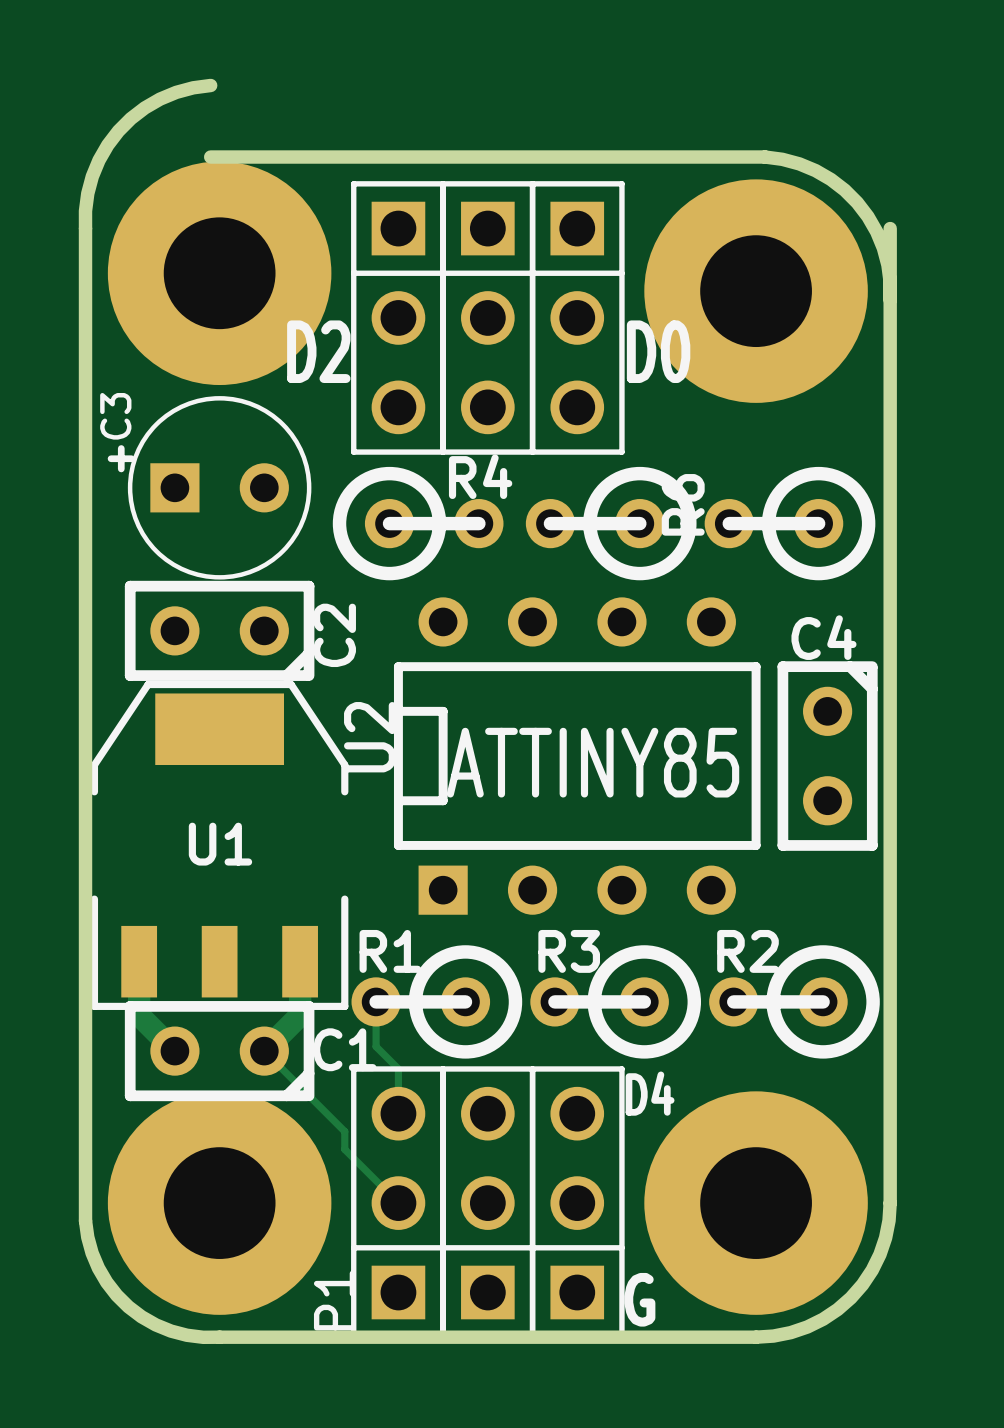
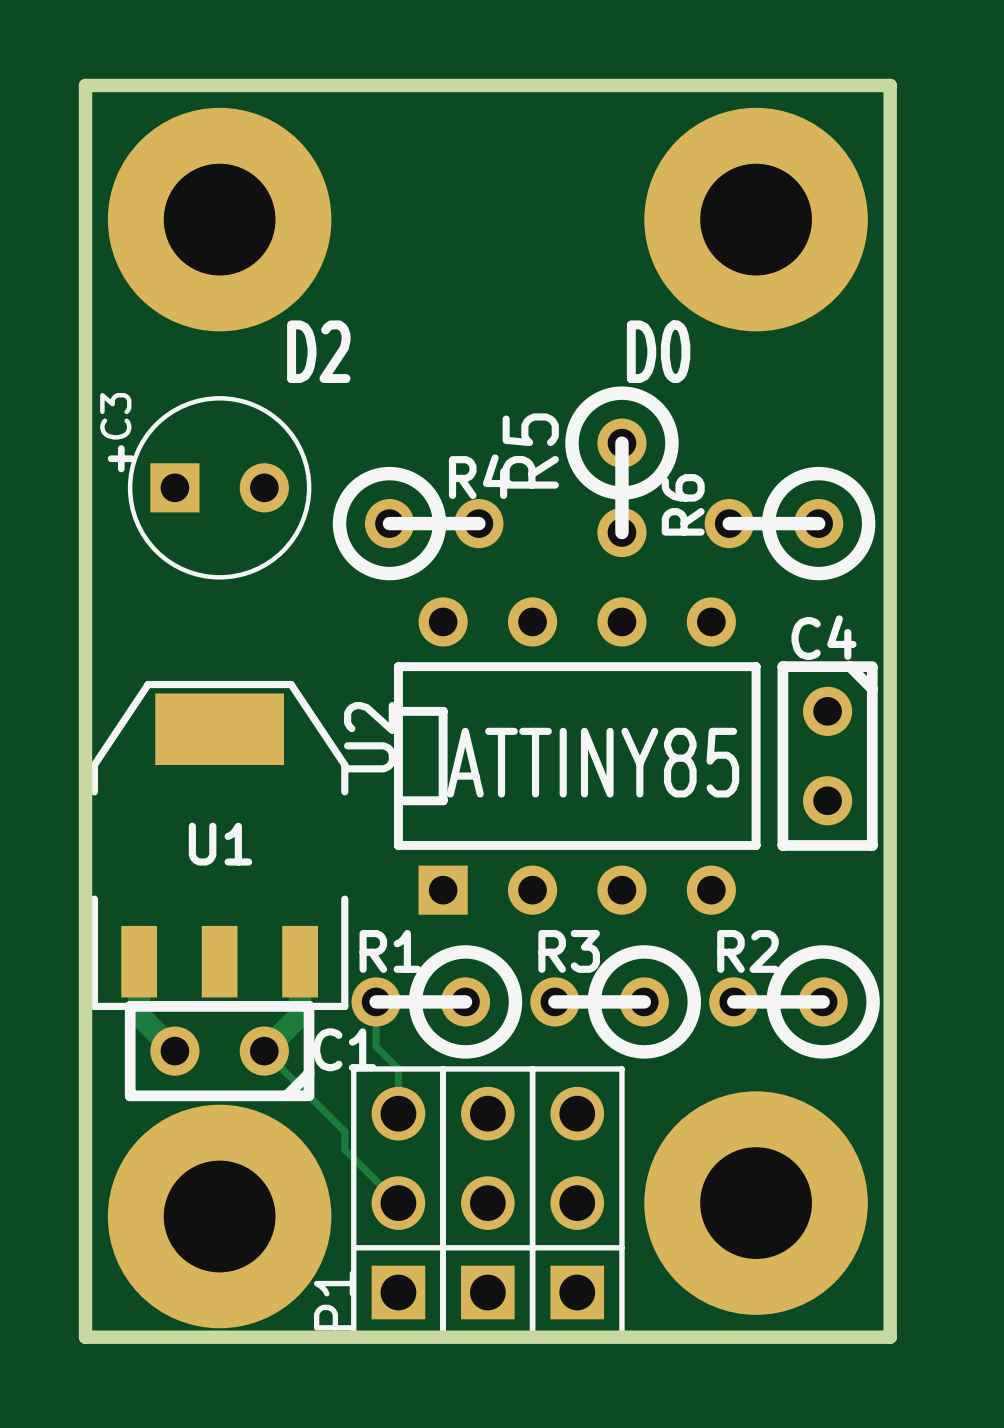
board edge: (210, 85) (176, 92) (160, 99) (130, 118) (118, 131) (107, 145) (92, 176) (87, 193) (85, 228) -> (890, 228) (890, 85) (85, 85) (85, 228)
board edge: (210, 157) (765, 157) (782, 159) (815, 170) (844, 190) (857, 202) (876, 231) (883, 248) (887, 265) (890, 300) -> none
part position: (219, 273) -> (219, 219)
part position: (756, 291) -> (756, 219)
part: (398, 317) -> none
part: (487, 317) -> none
part: (577, 317) -> none
R5: none -> (621, 471)
part: (611, 523) -> none
C2: (219, 630) -> none
text: D4 (650, 1093) -> none
part position: (219, 1203) -> (219, 1216)
board edge: (890, 1203) (889, 1220) (879, 1254) (872, 1270) (850, 1297) (823, 1319) (807, 1326) (773, 1336) (756, 1337) -> (890, 1203) (890, 1337) (756, 1337)
board edge: (85, 1220) (87, 1237) (98, 1268) (116, 1295) (128, 1306) (155, 1324) (171, 1331) (186, 1335) (219, 1337) -> (85, 1220) (85, 1337) (219, 1337)
text: G (639, 1299) -> none

